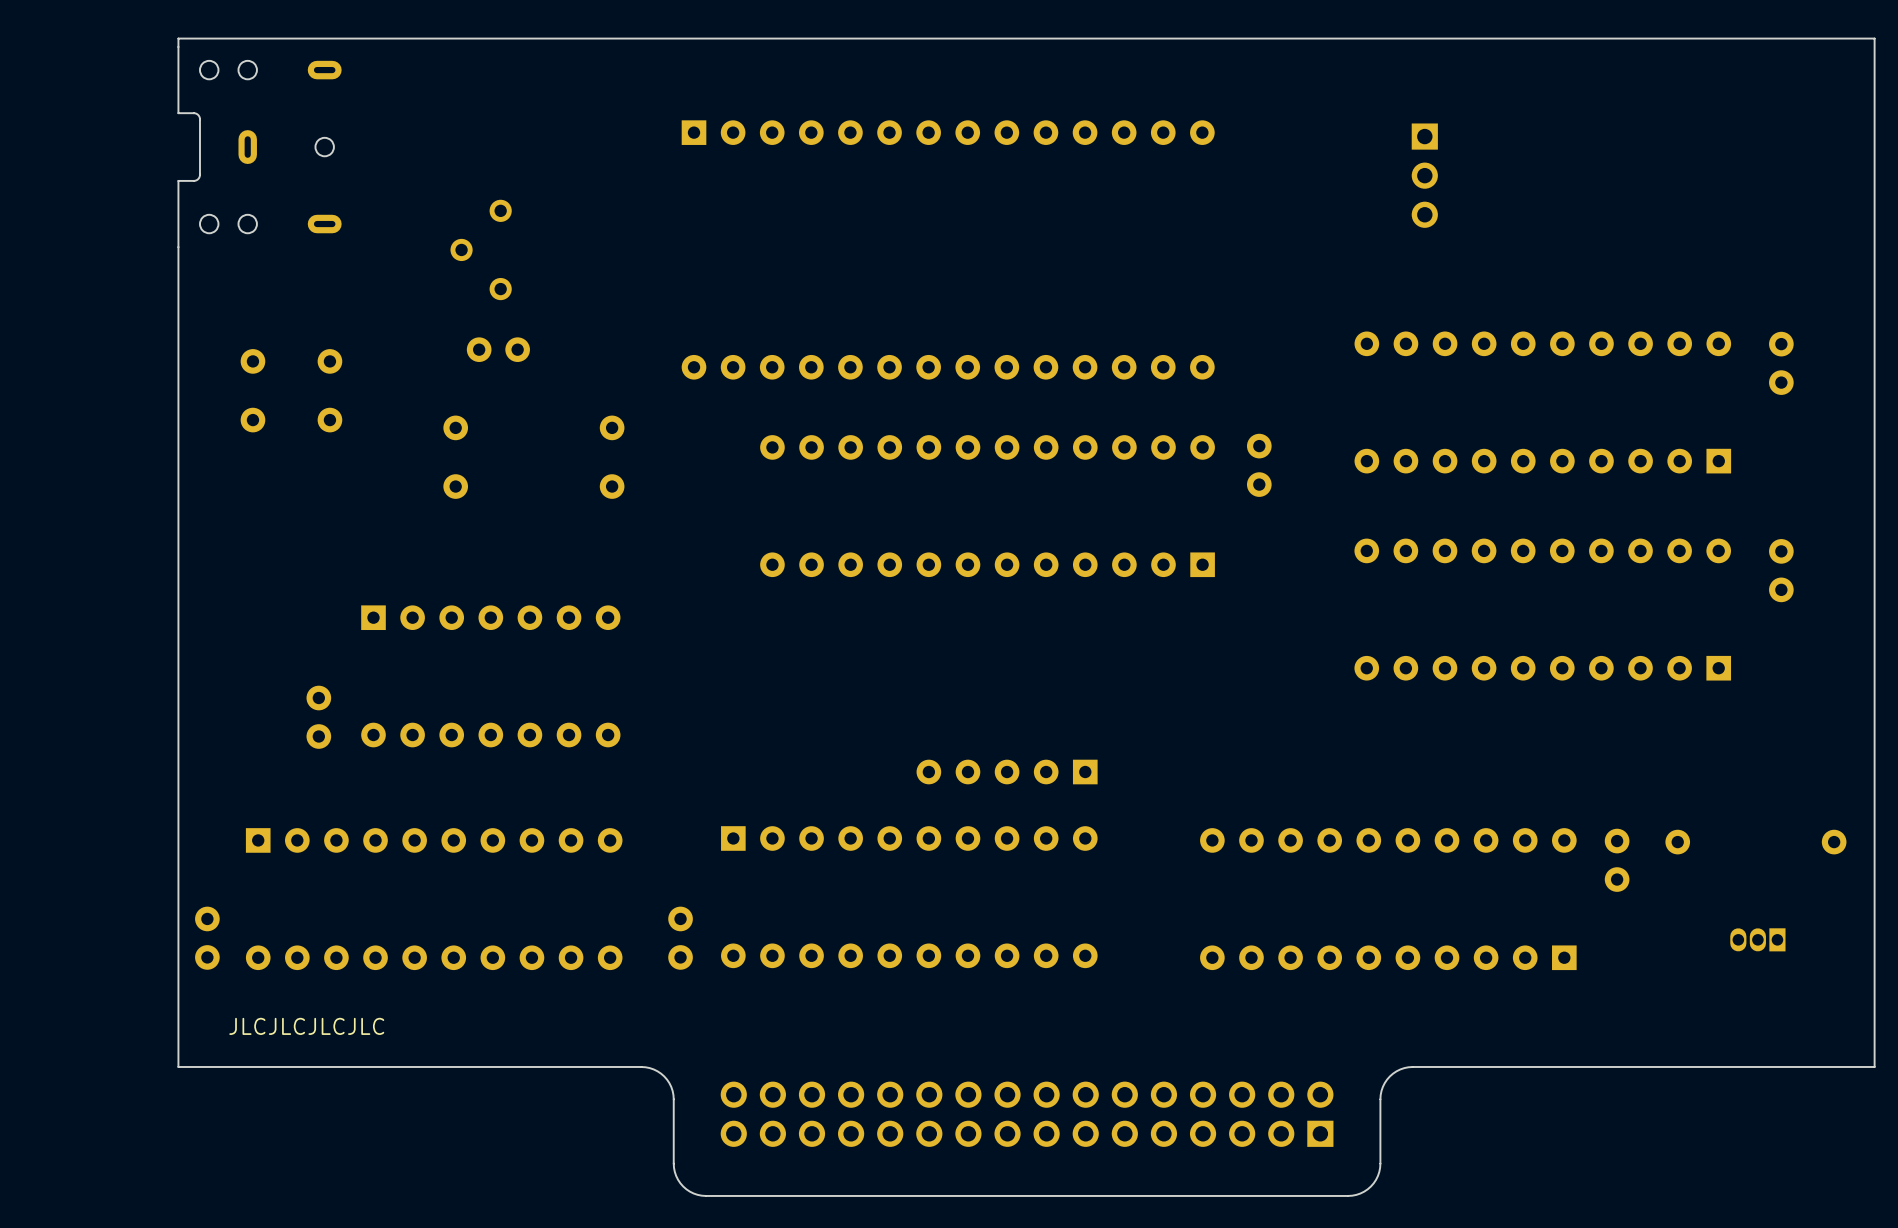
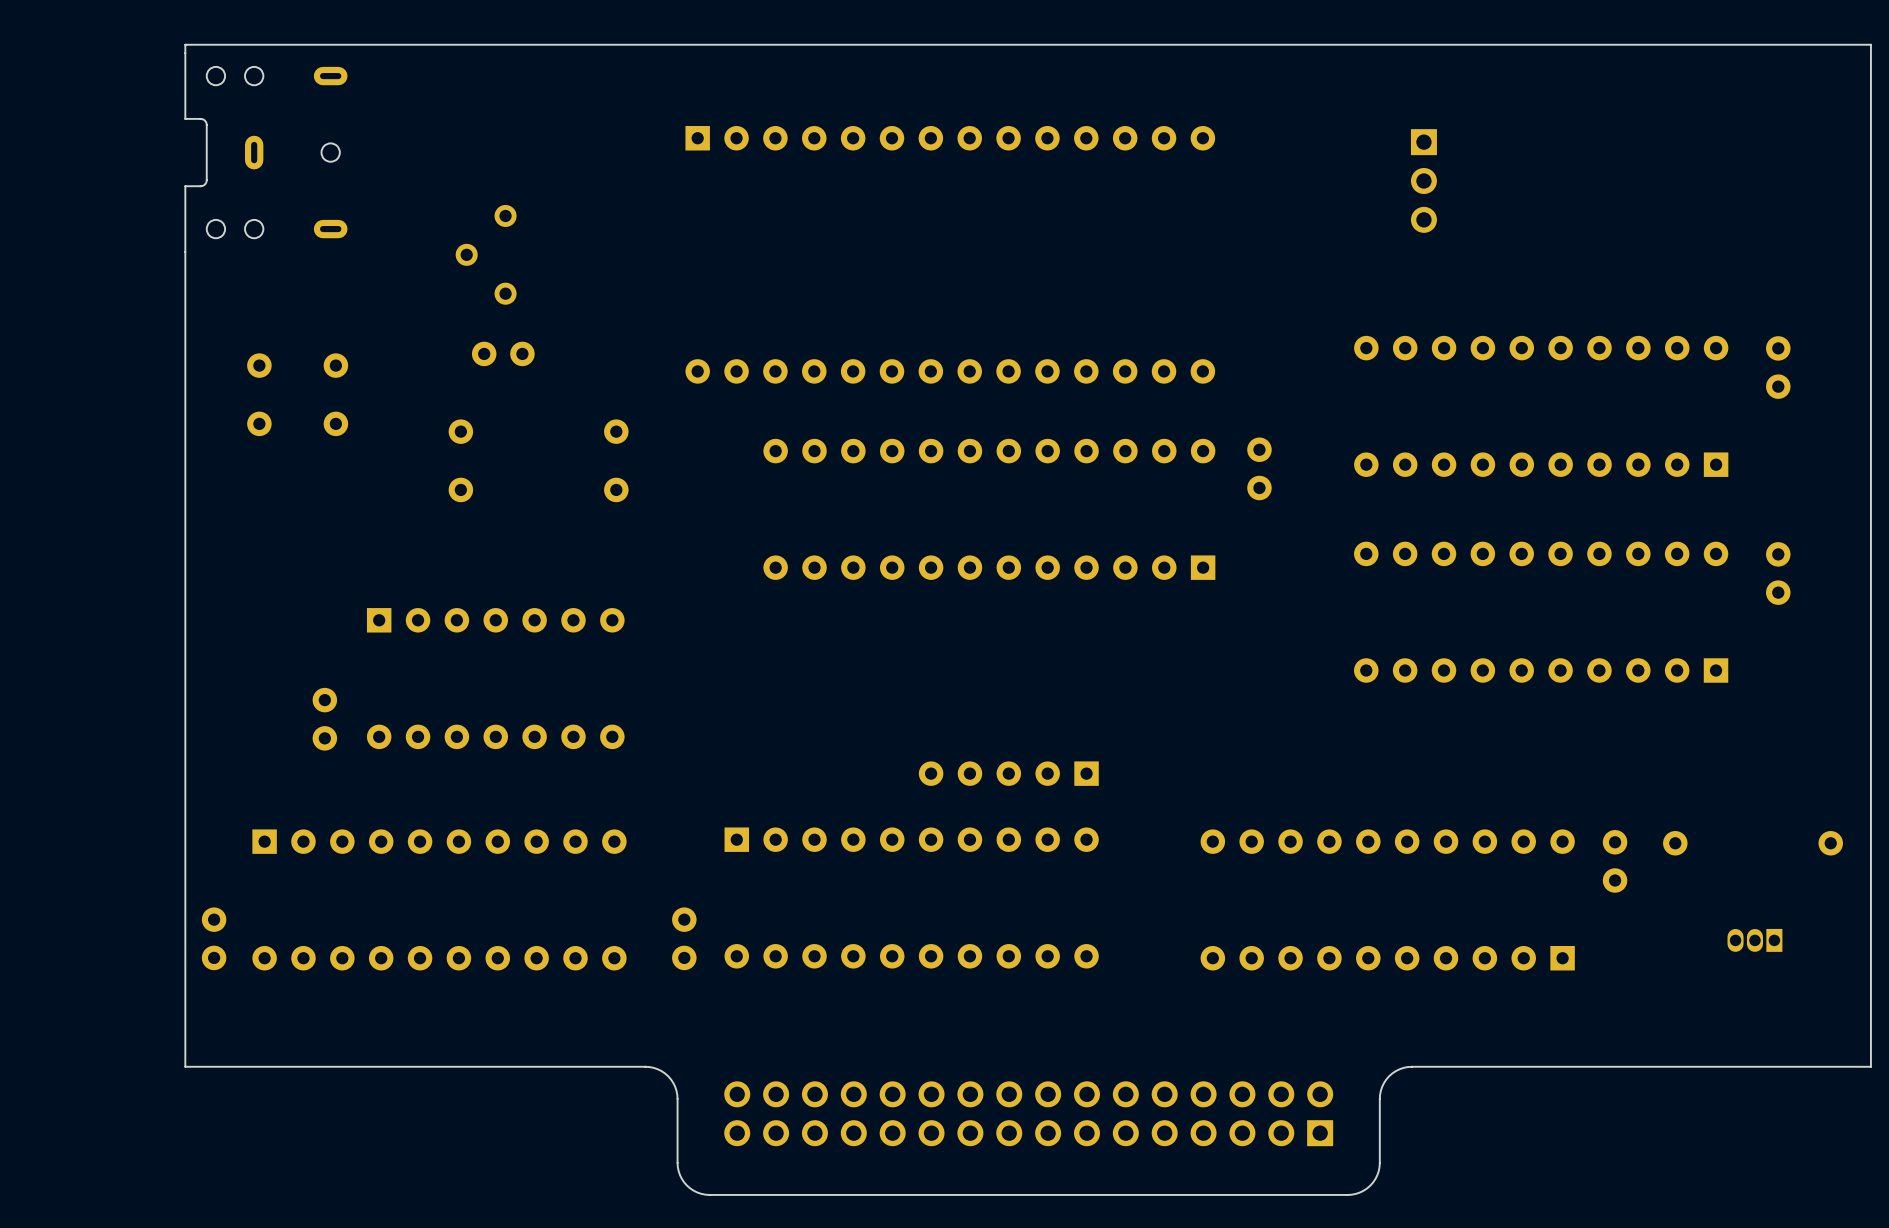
text: JLCJLCJLCJLC (306, 1026) -> none

